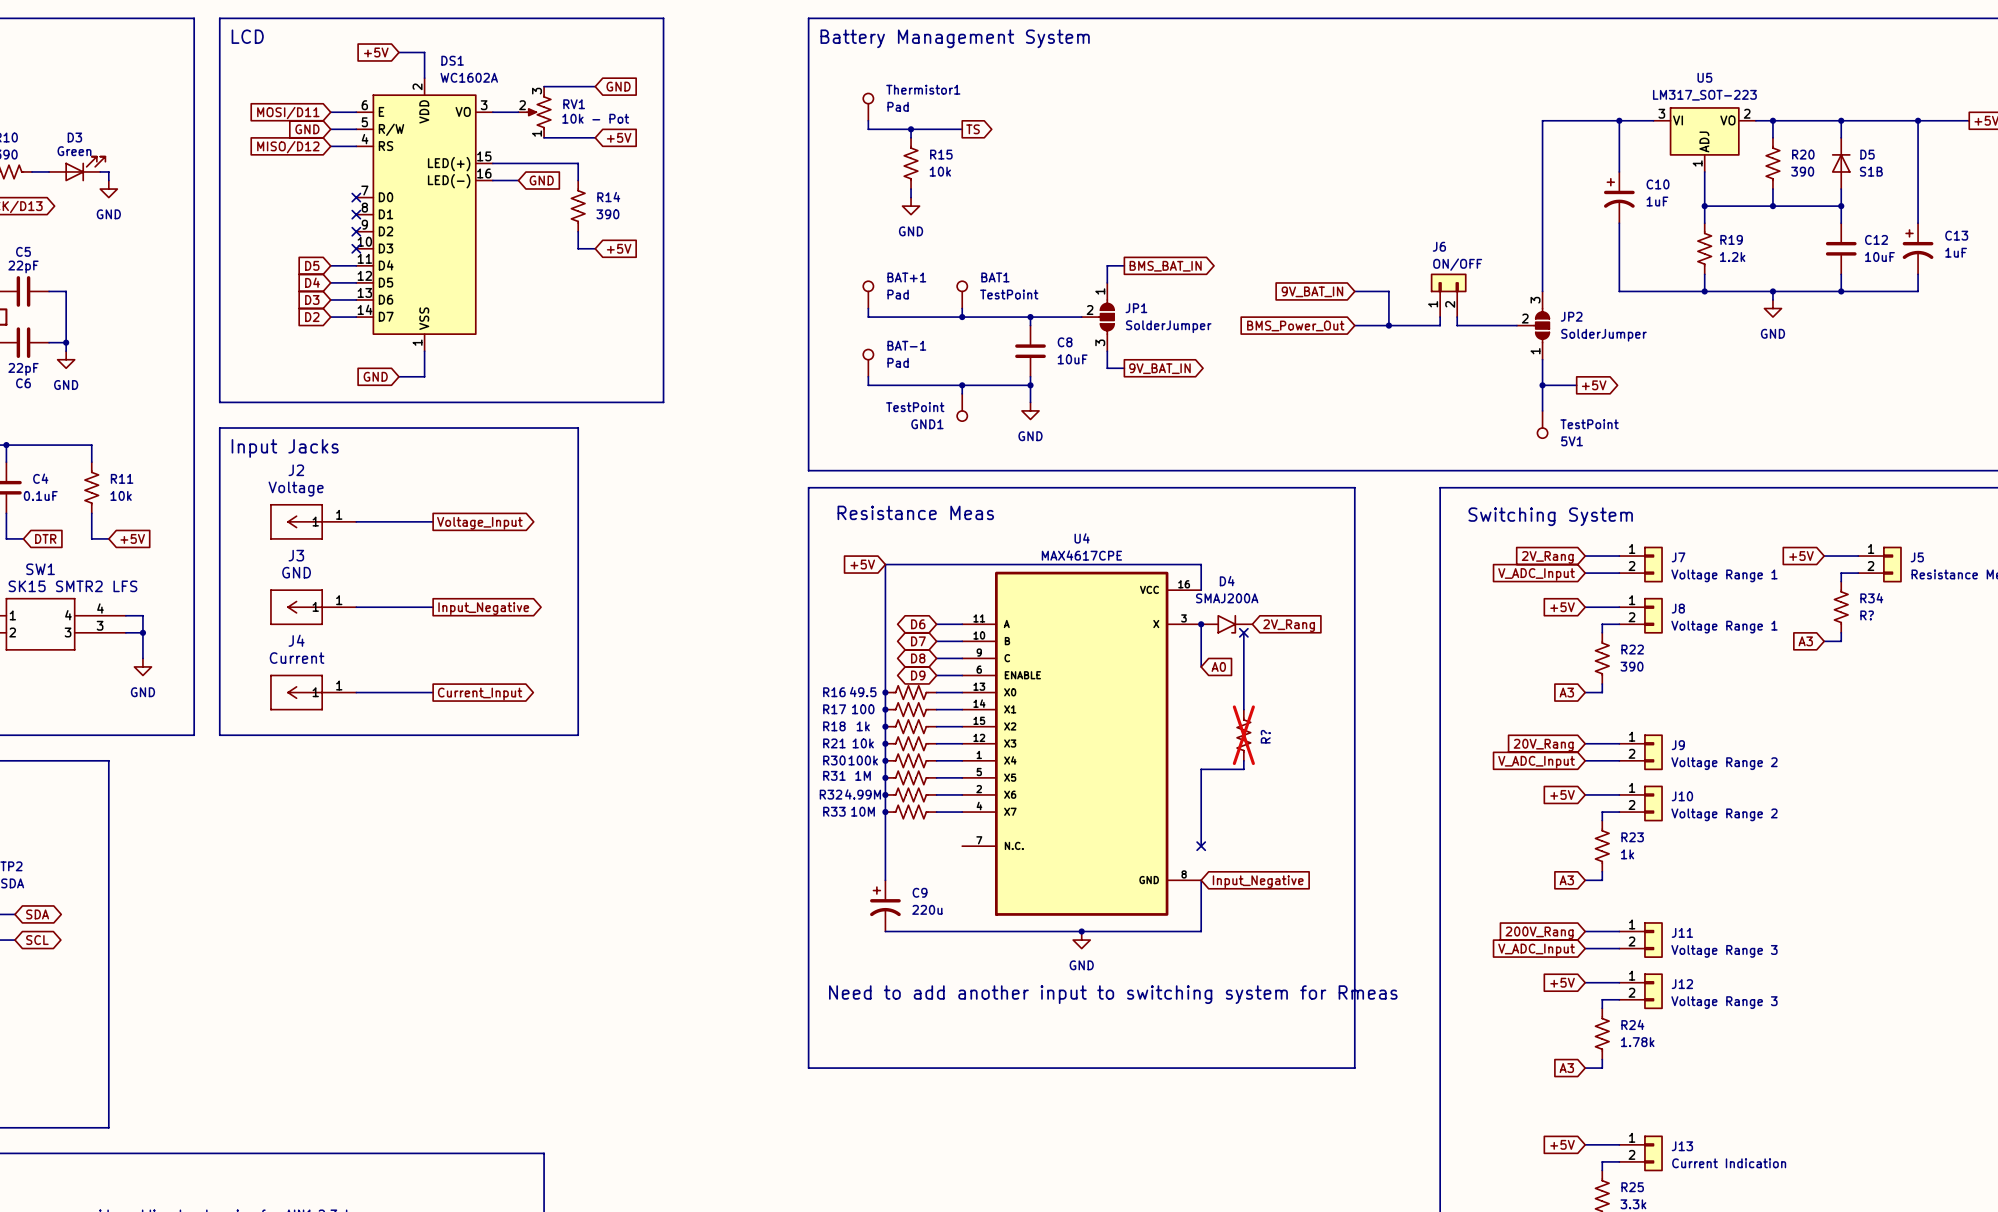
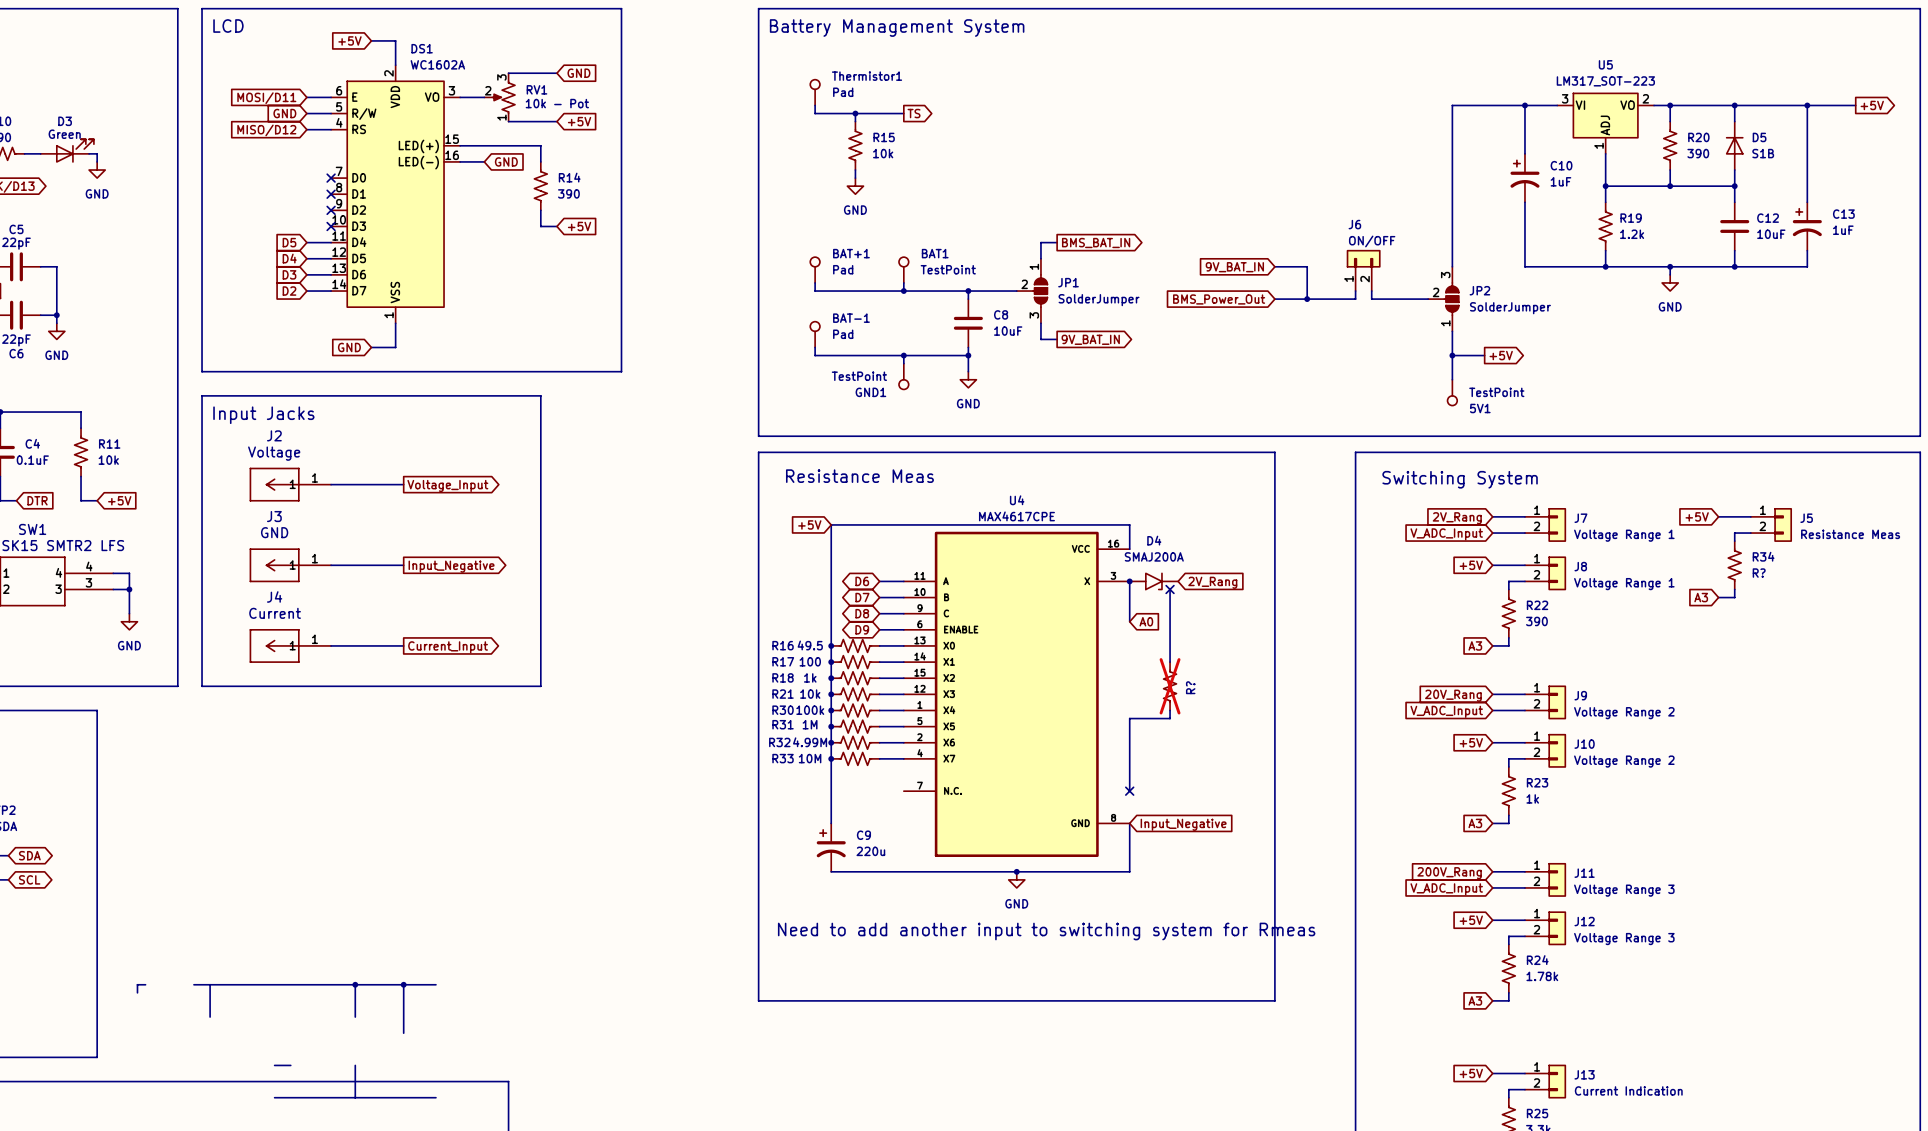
wire: none -> (145, 984) (137, 984) (137, 992)
wire: none -> (193, 984) (435, 984)
wire: none -> (210, 984) (210, 1017)
wire: none -> (355, 984) (355, 1017)
junction: none -> (355, 984)
wire: none -> (403, 984) (403, 1033)
junction: none -> (403, 984)
wire: none -> (274, 1065) (290, 1065)
wire: none -> (355, 1065) (355, 1097)
wire: none -> (274, 1097) (435, 1097)

